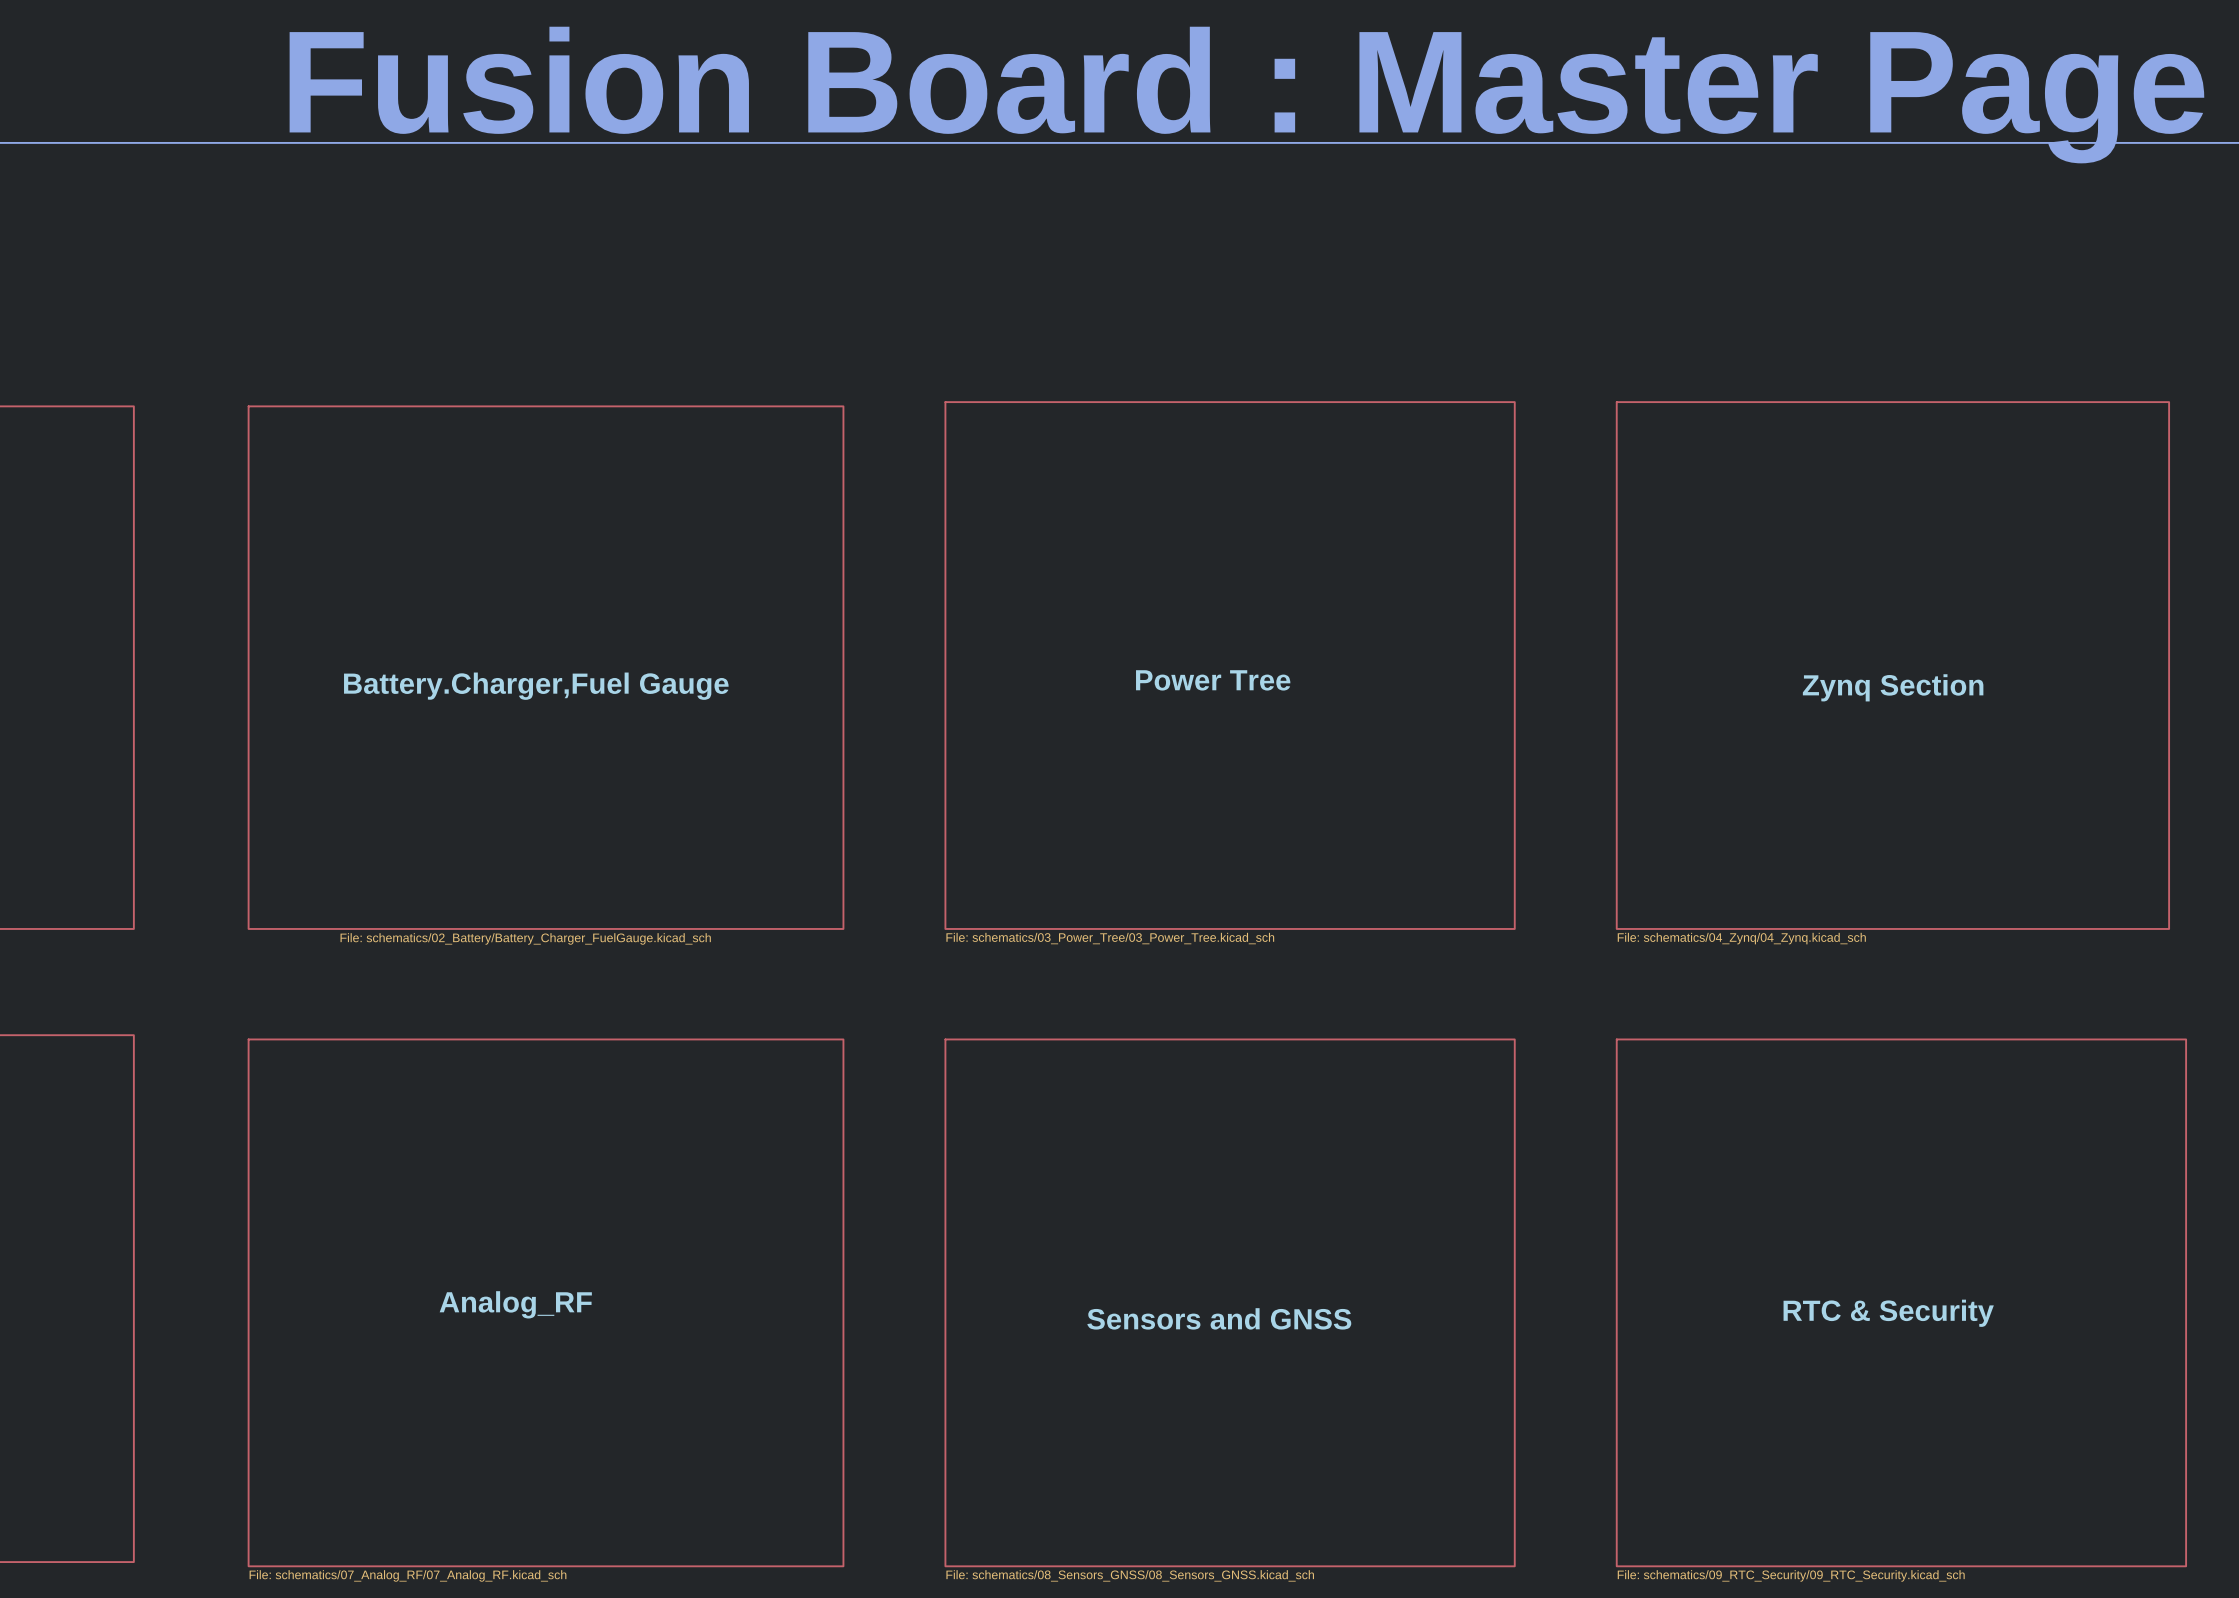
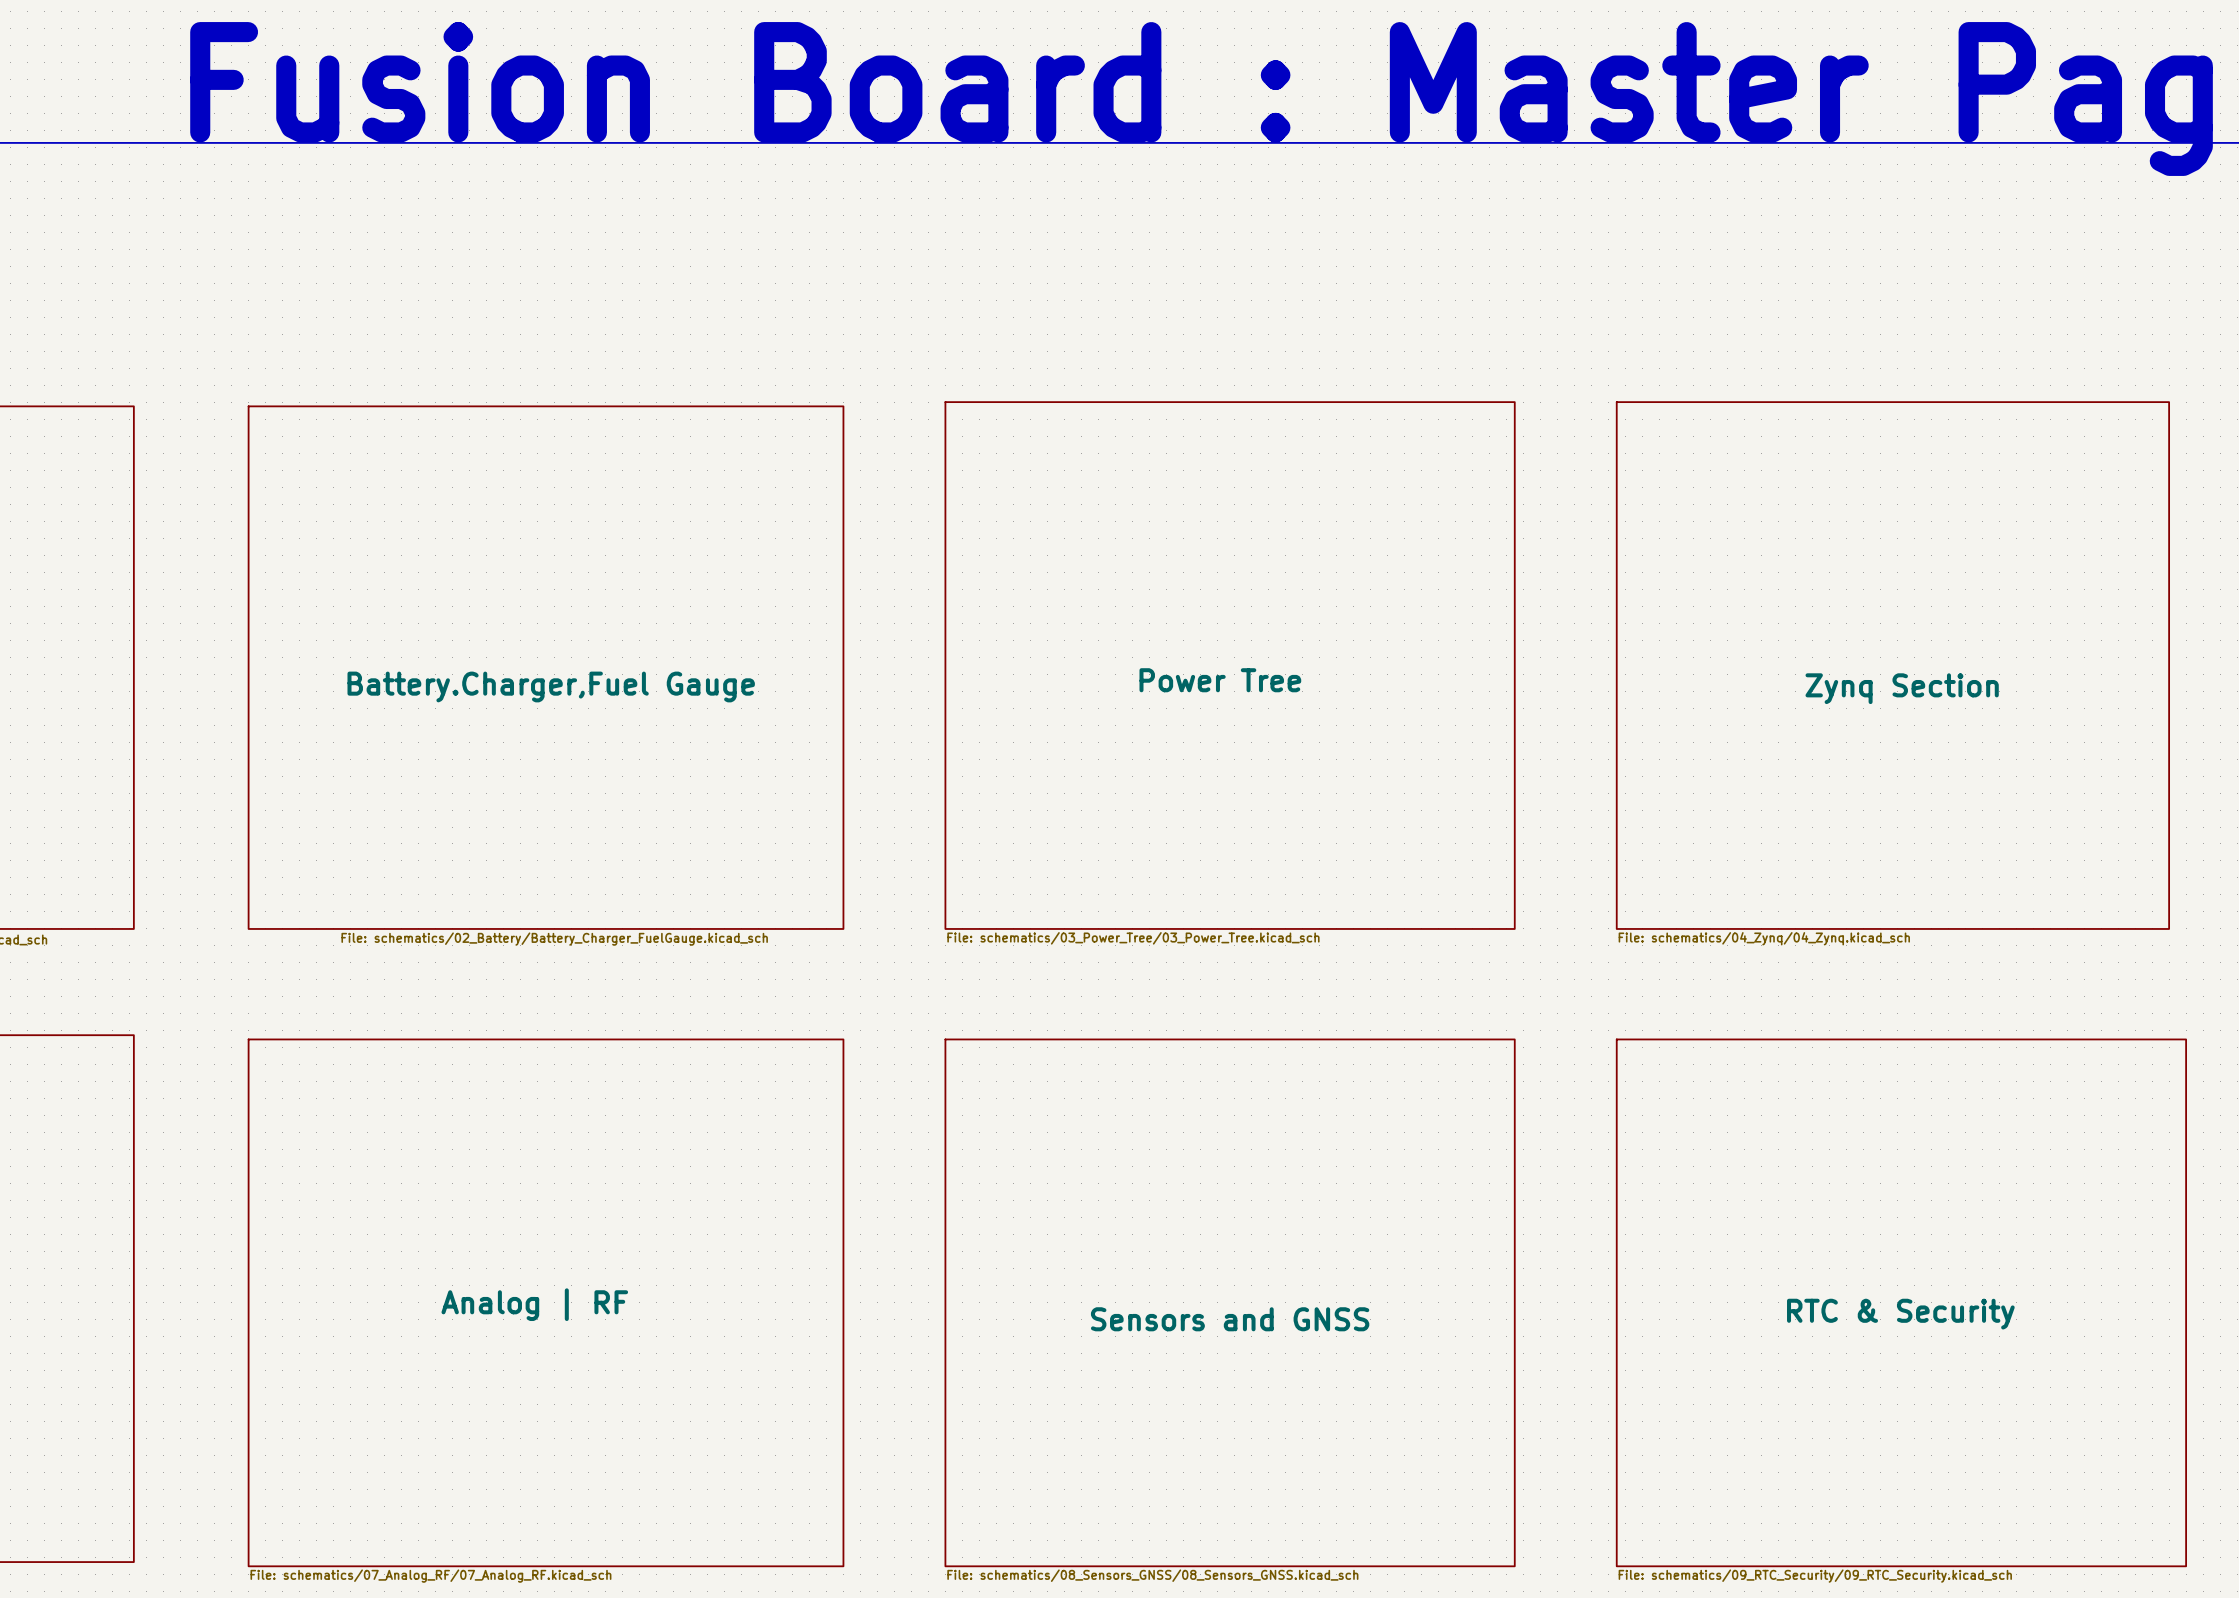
sheet Analog_RF name: Analog_RF (515, 1304) -> Analog | RF (534, 1304)

